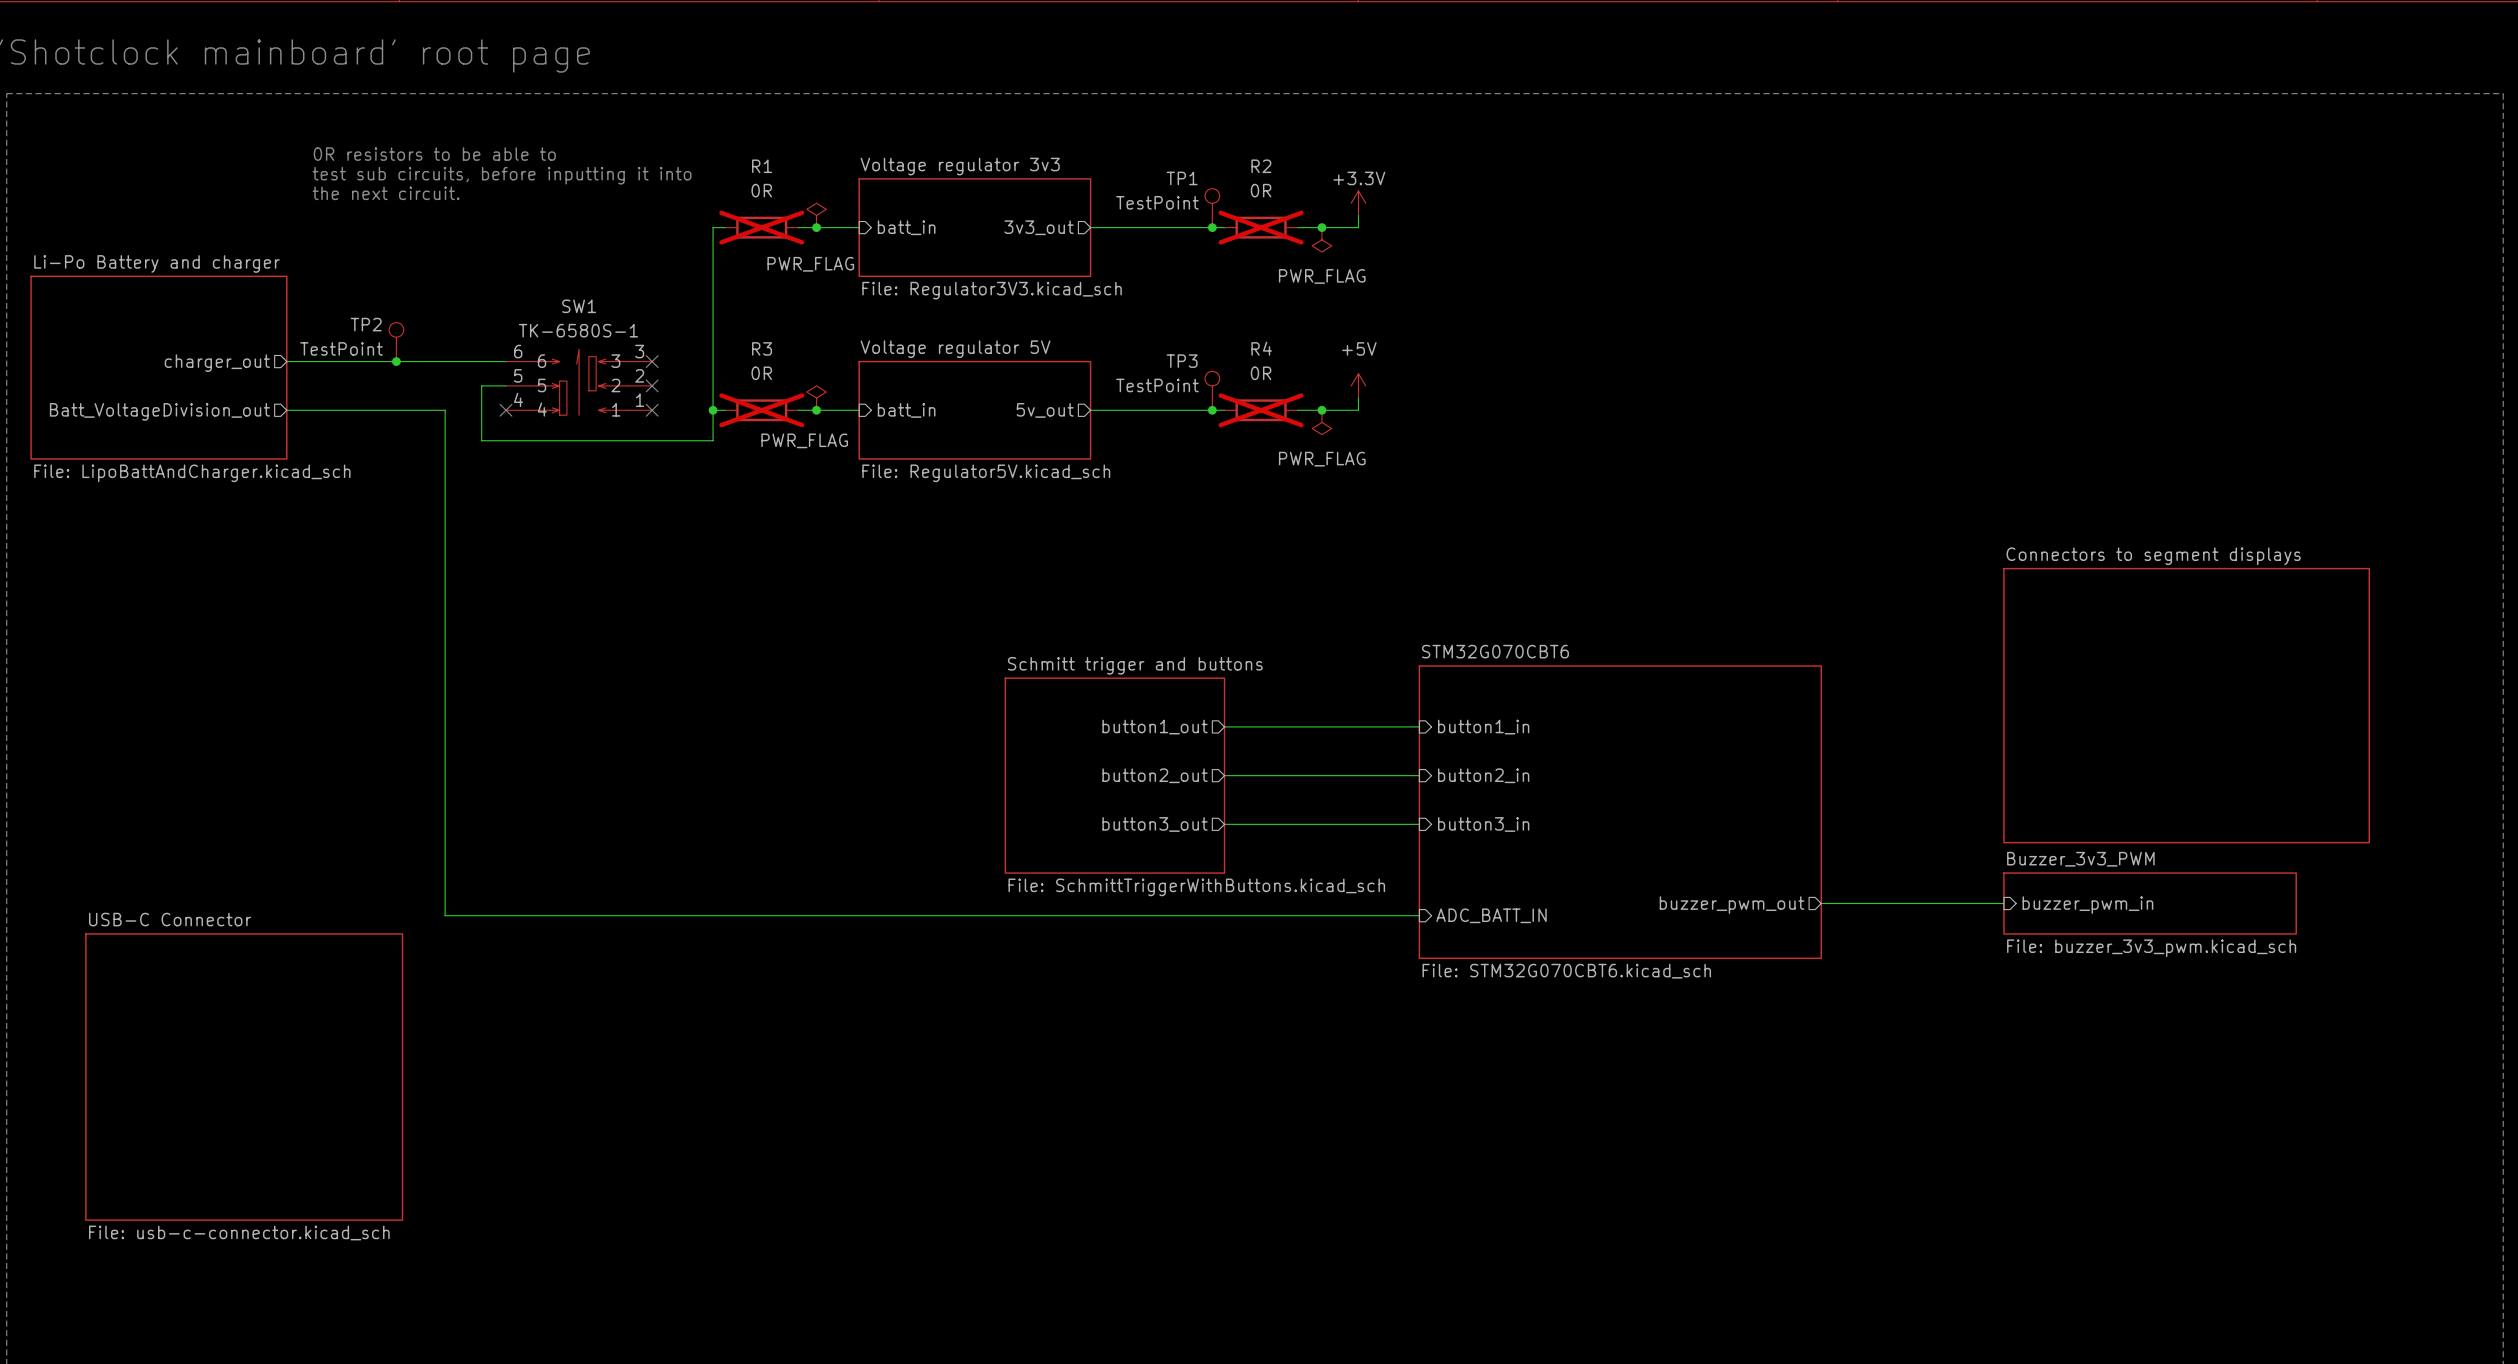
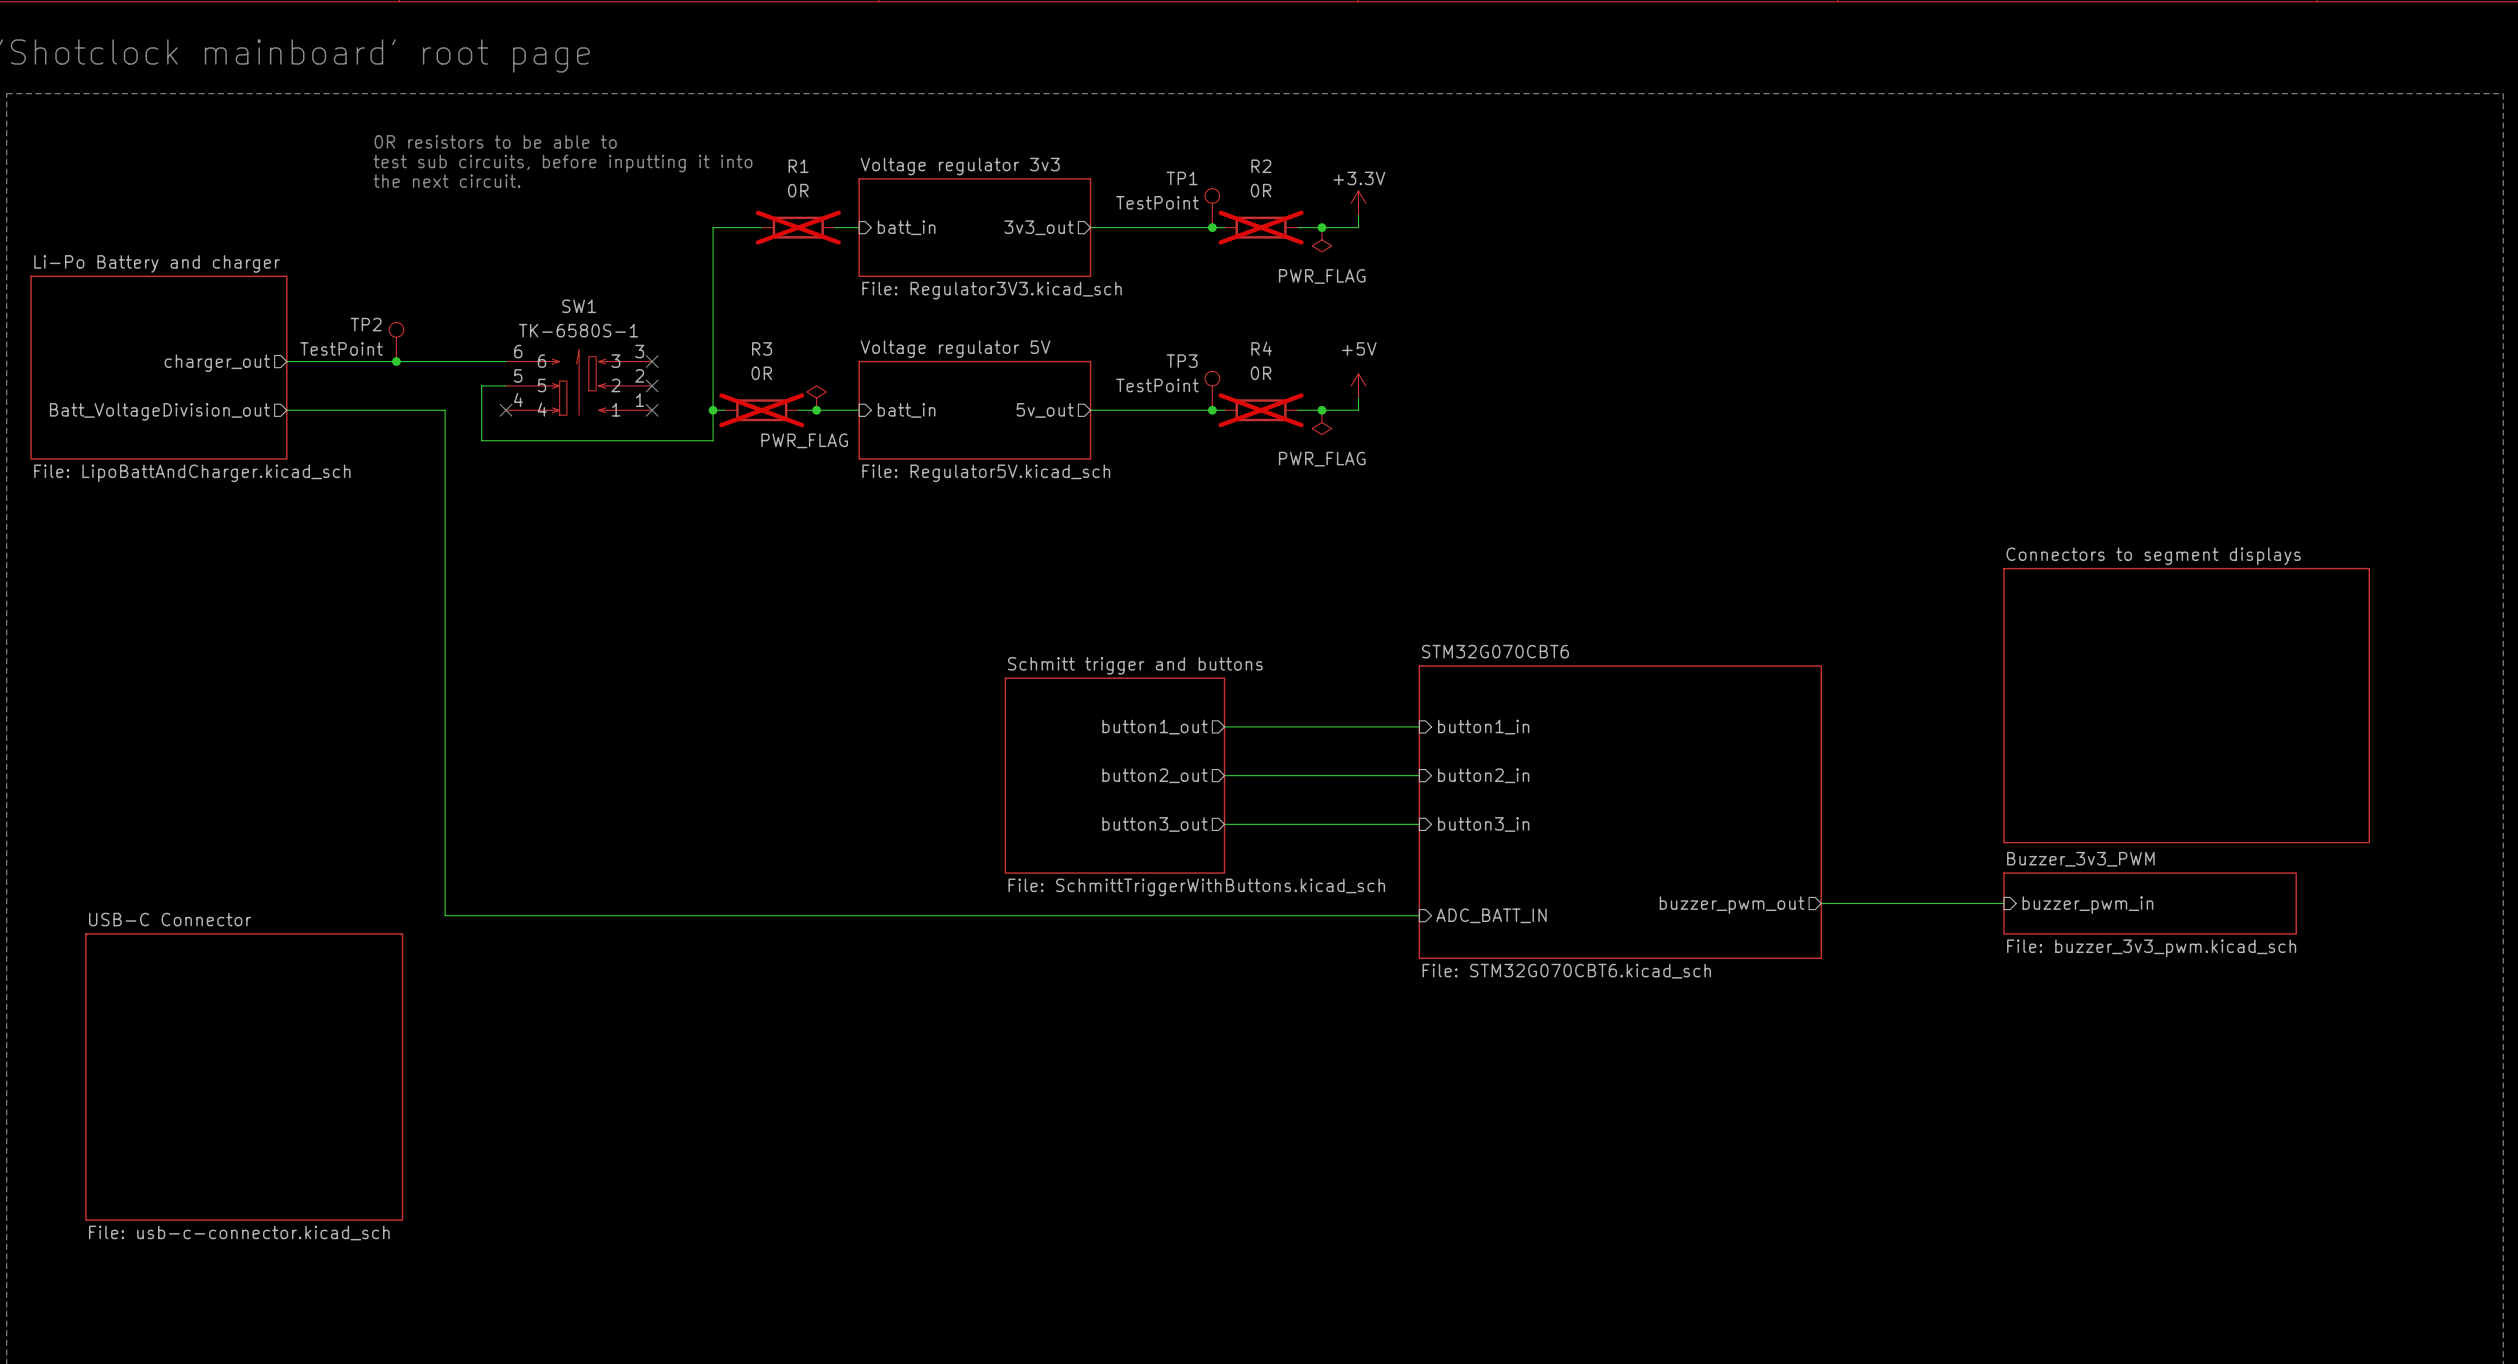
text position: 0R resistors to be able to (434, 154) -> 0R resistors to be able to (495, 141)
text position: test sub circuits, before inputting it into (502, 175) -> test sub circuits, before inputting it into (562, 163)
text position: the next circuit. (386, 193) -> the next circuit. (446, 181)
power symbol: PWR_FLAG (816, 215) -> none
R1 position: (761, 227) -> (798, 227)
junction: (816, 227) -> none

